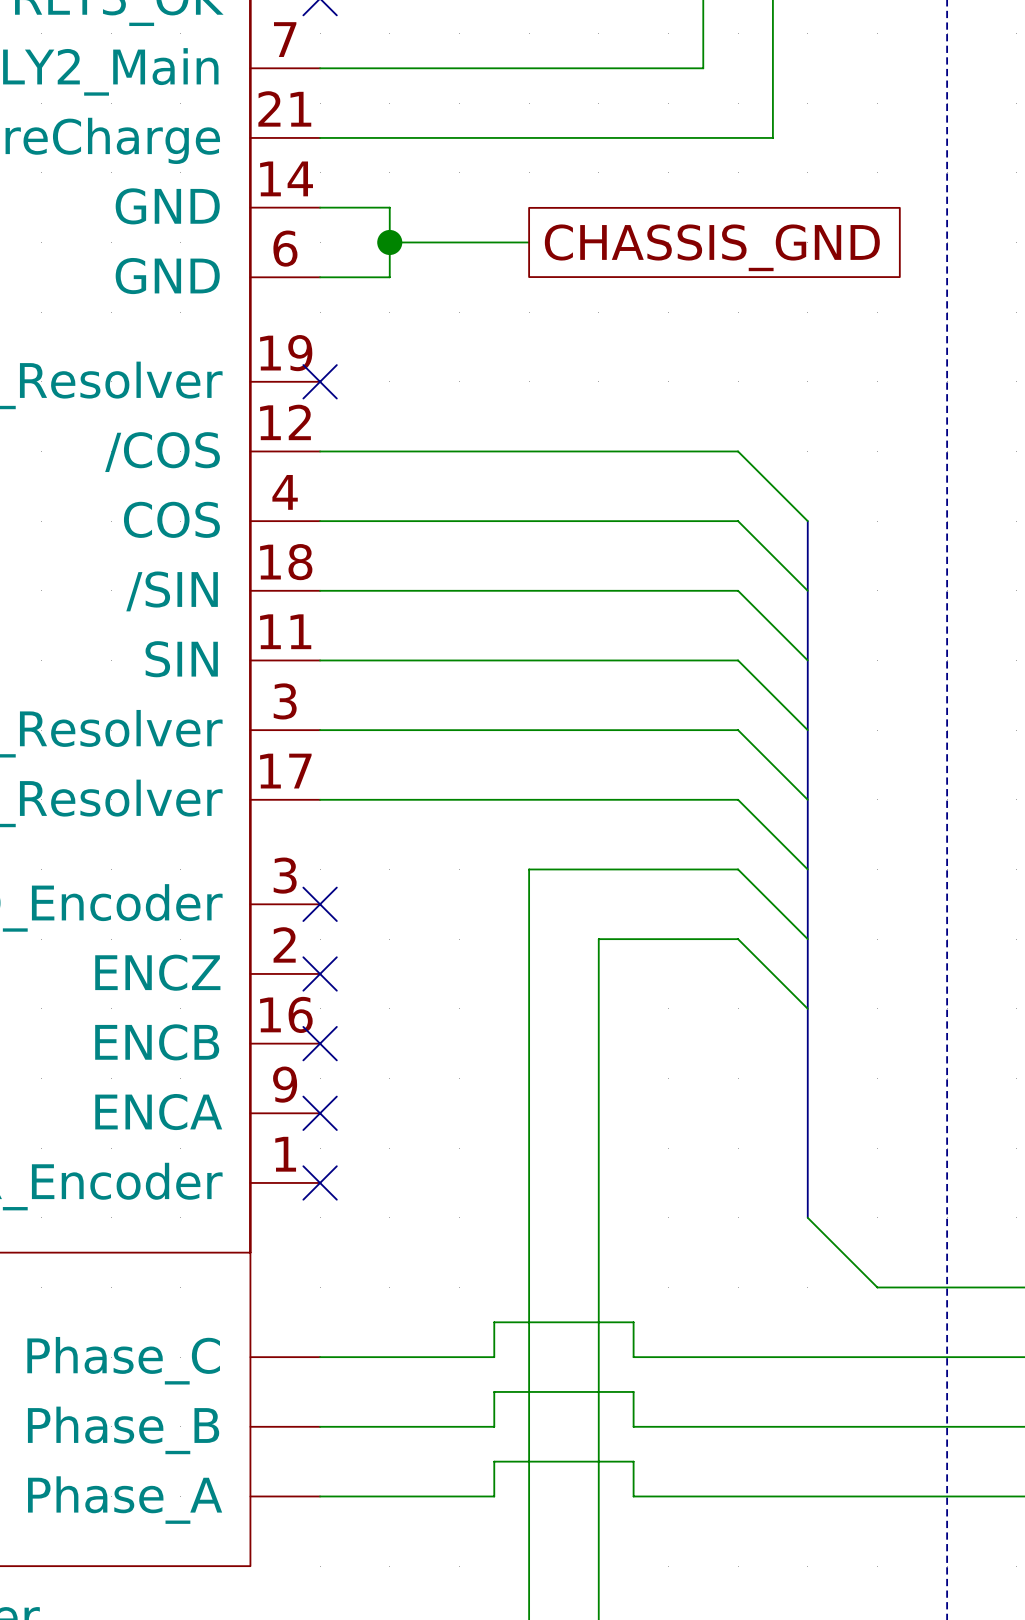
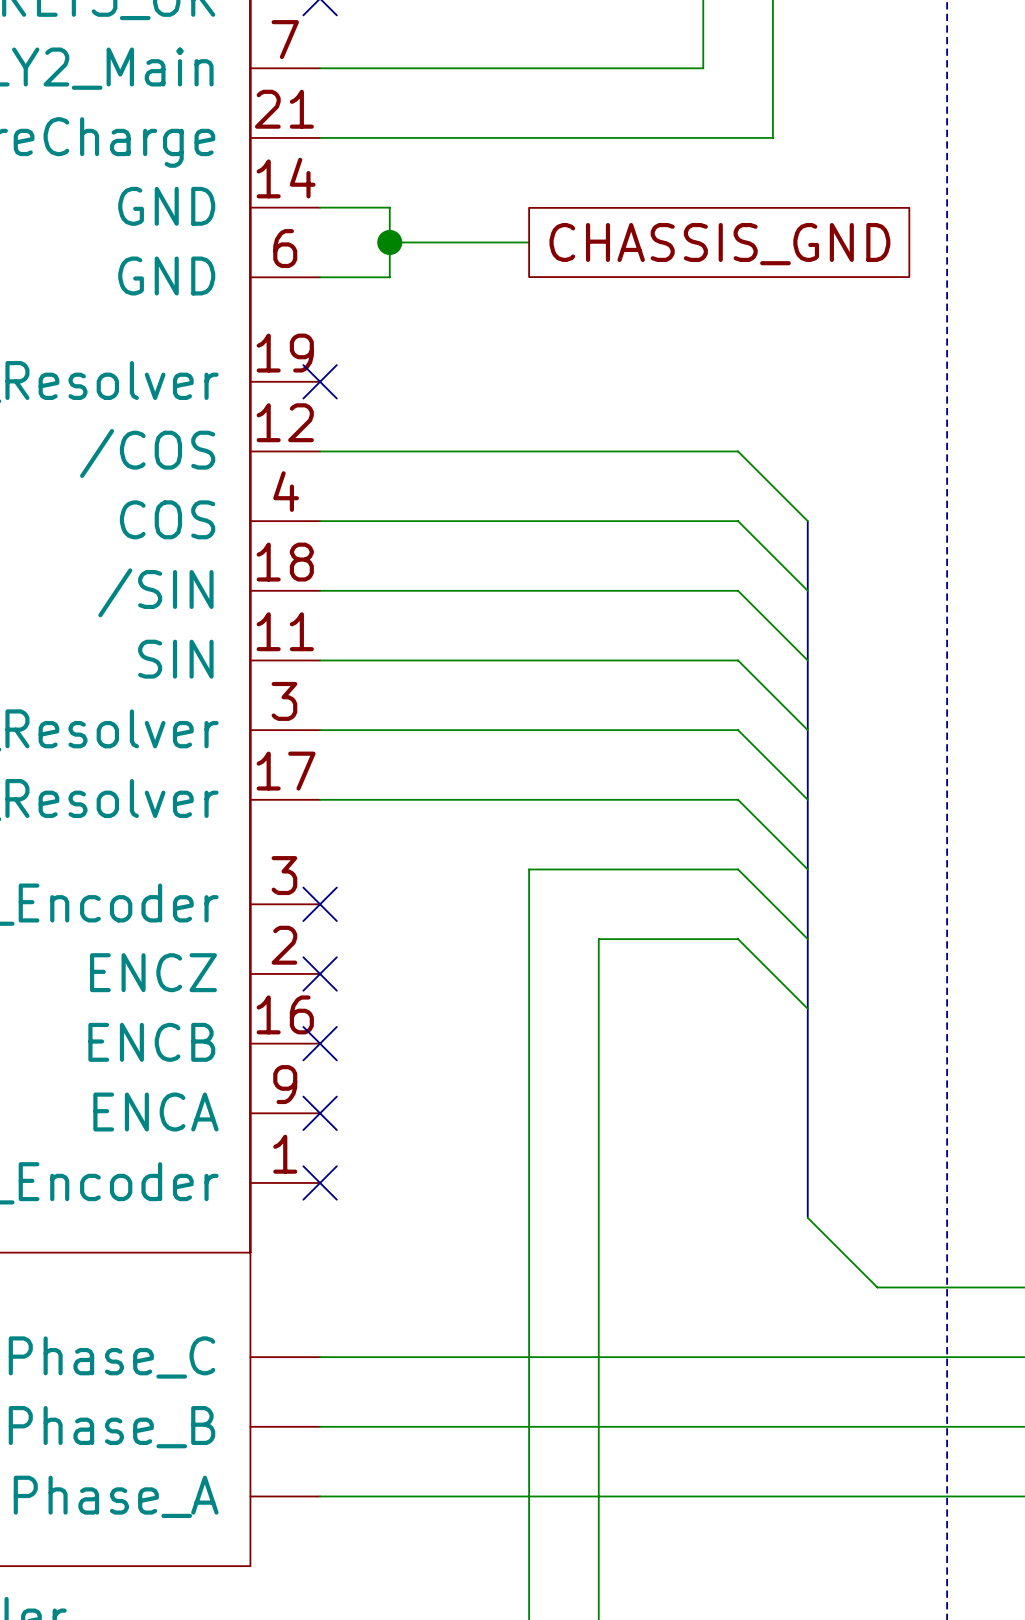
wire: (494, 1357) (494, 1322) (633, 1322) (633, 1357) -> (494, 1357) (633, 1357)
wire: (494, 1426) (494, 1391) (633, 1391) (633, 1426) -> (494, 1426) (633, 1426)
wire: (494, 1496) (494, 1461) (633, 1461) (633, 1496) -> (494, 1496) (633, 1496)

